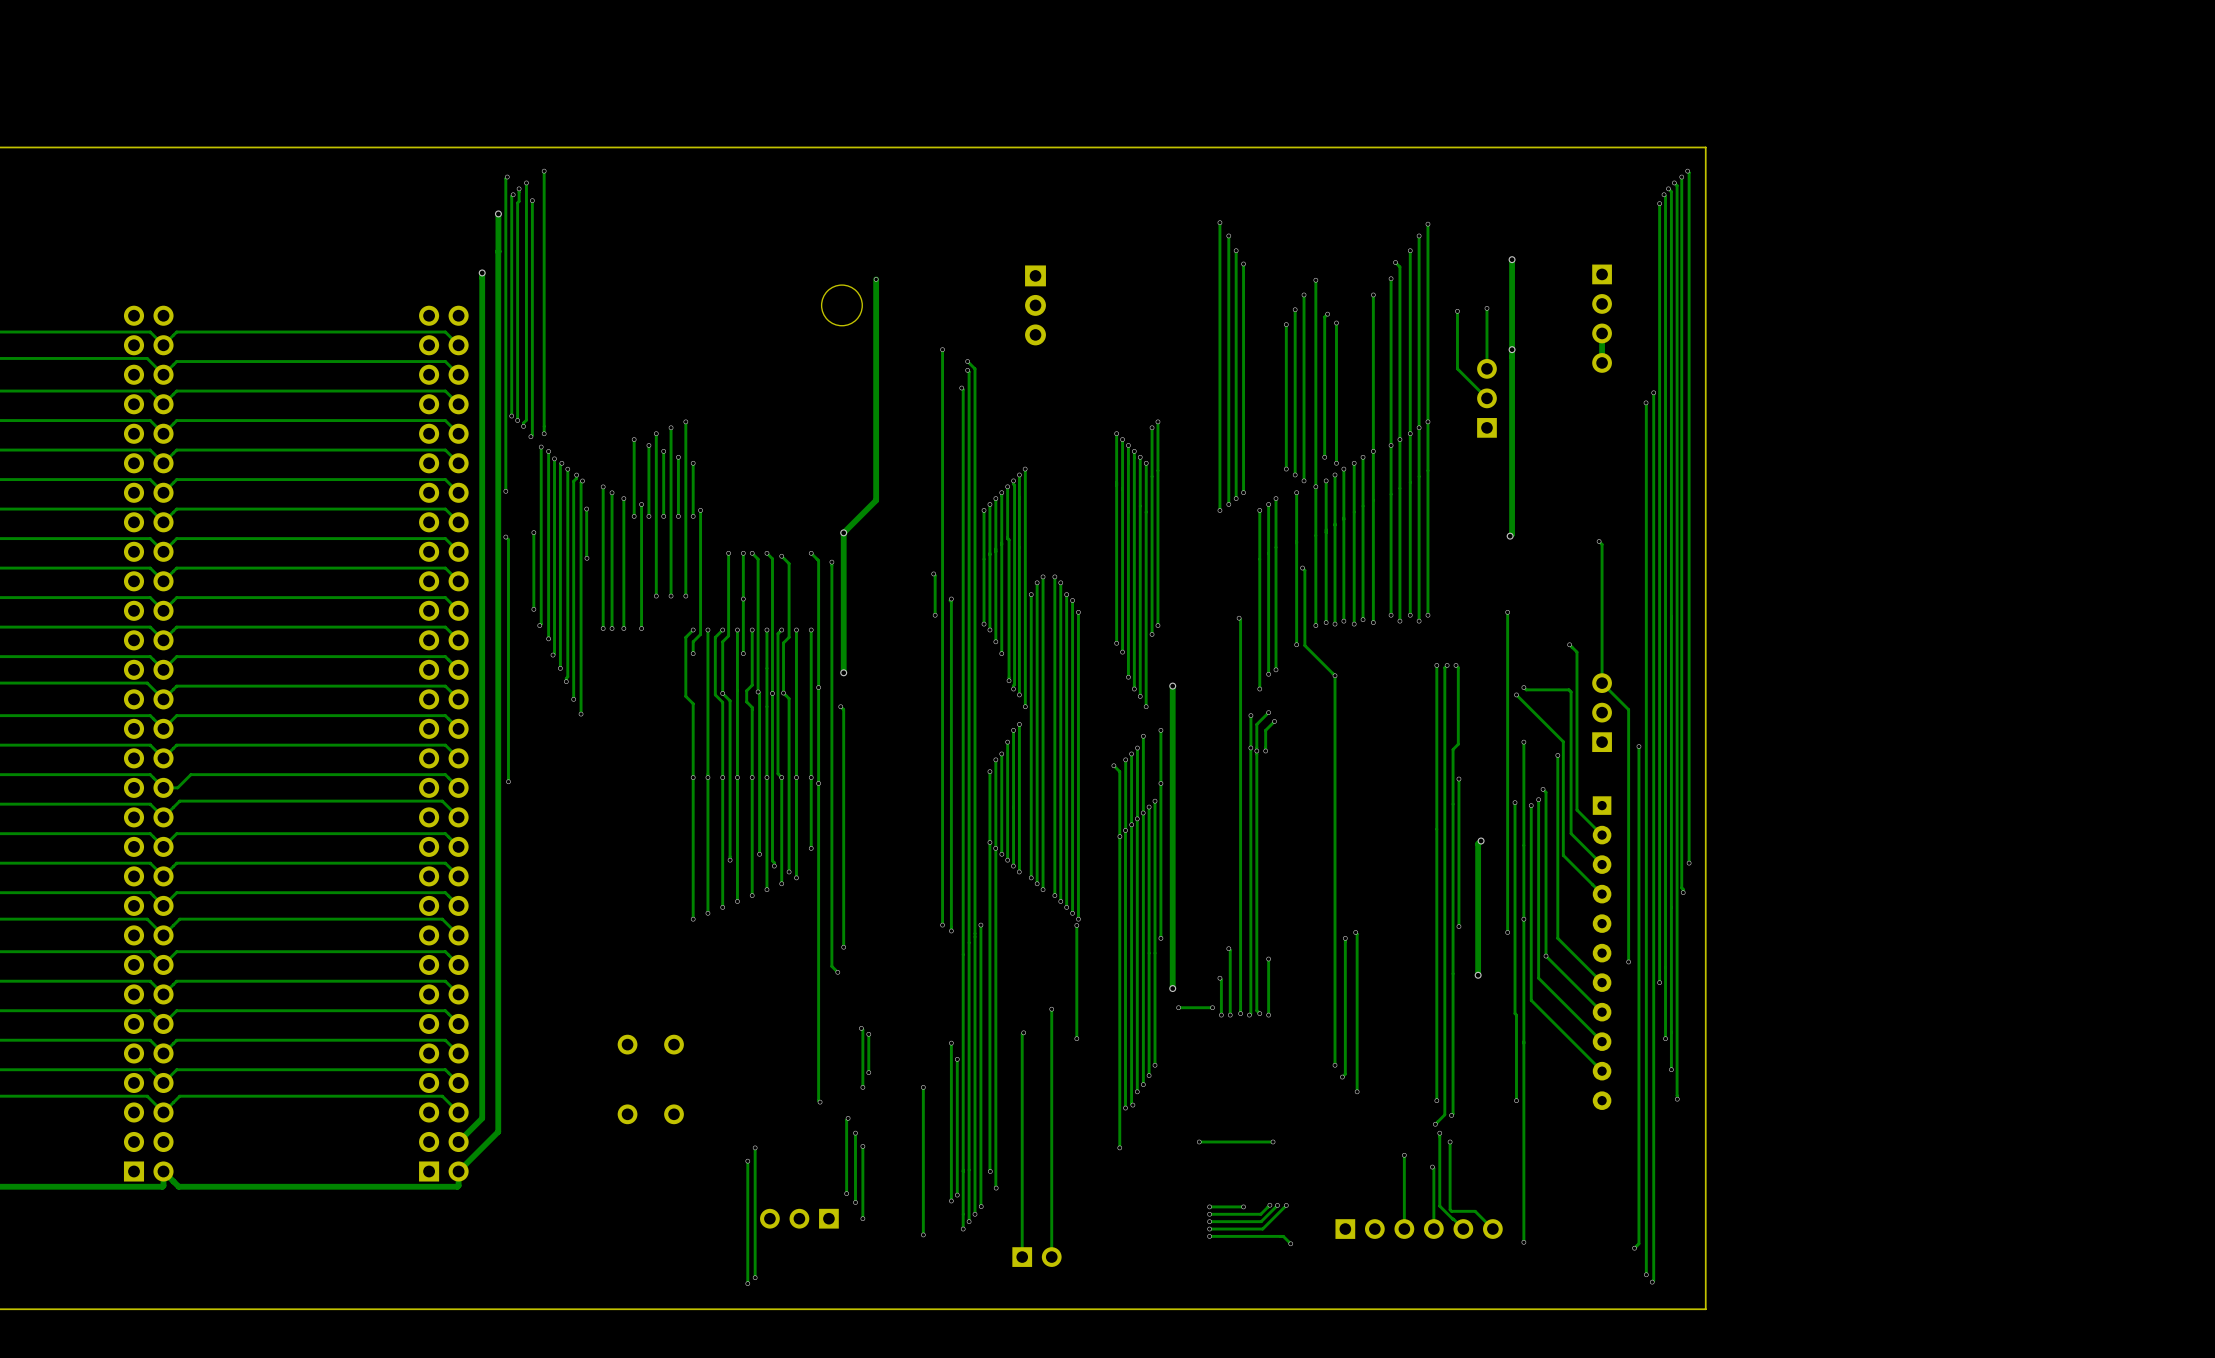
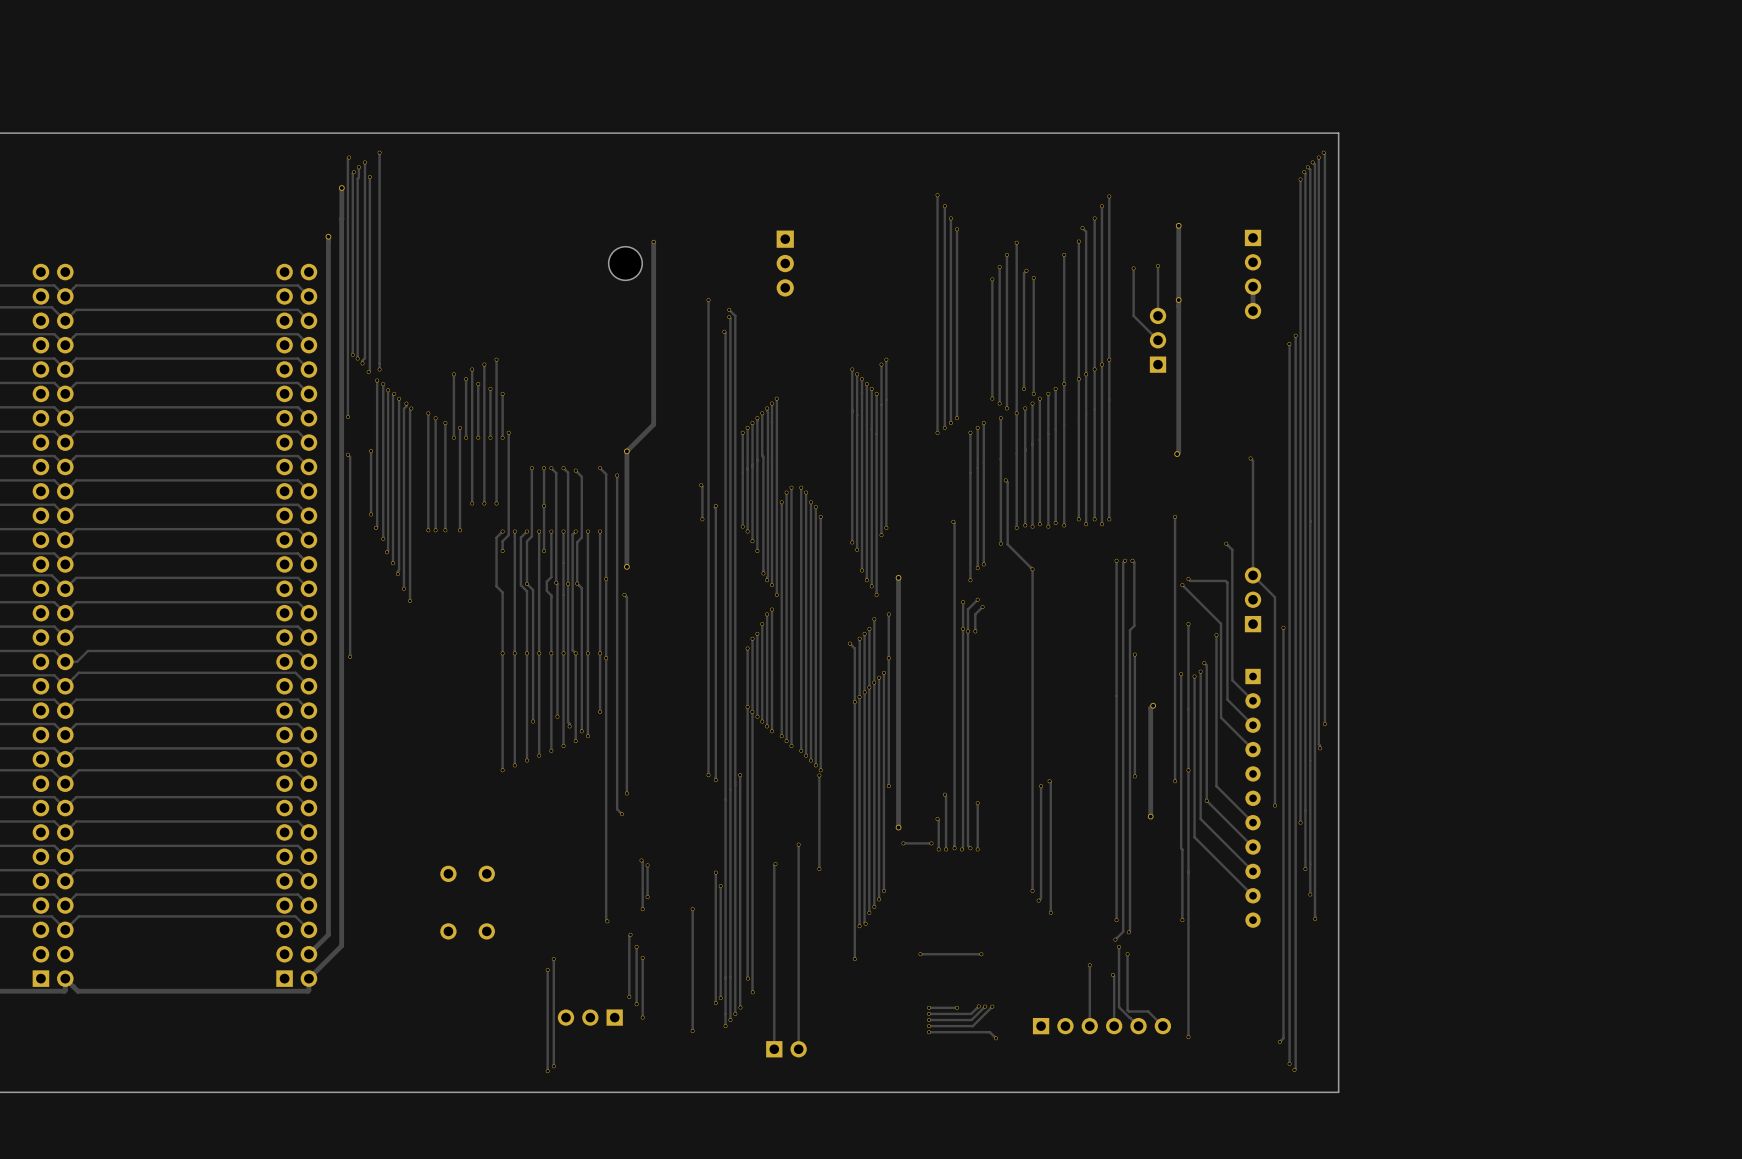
track: (586, 509) (586, 558) -> none
via: (586, 509) -> none
via: (586, 558) -> none

